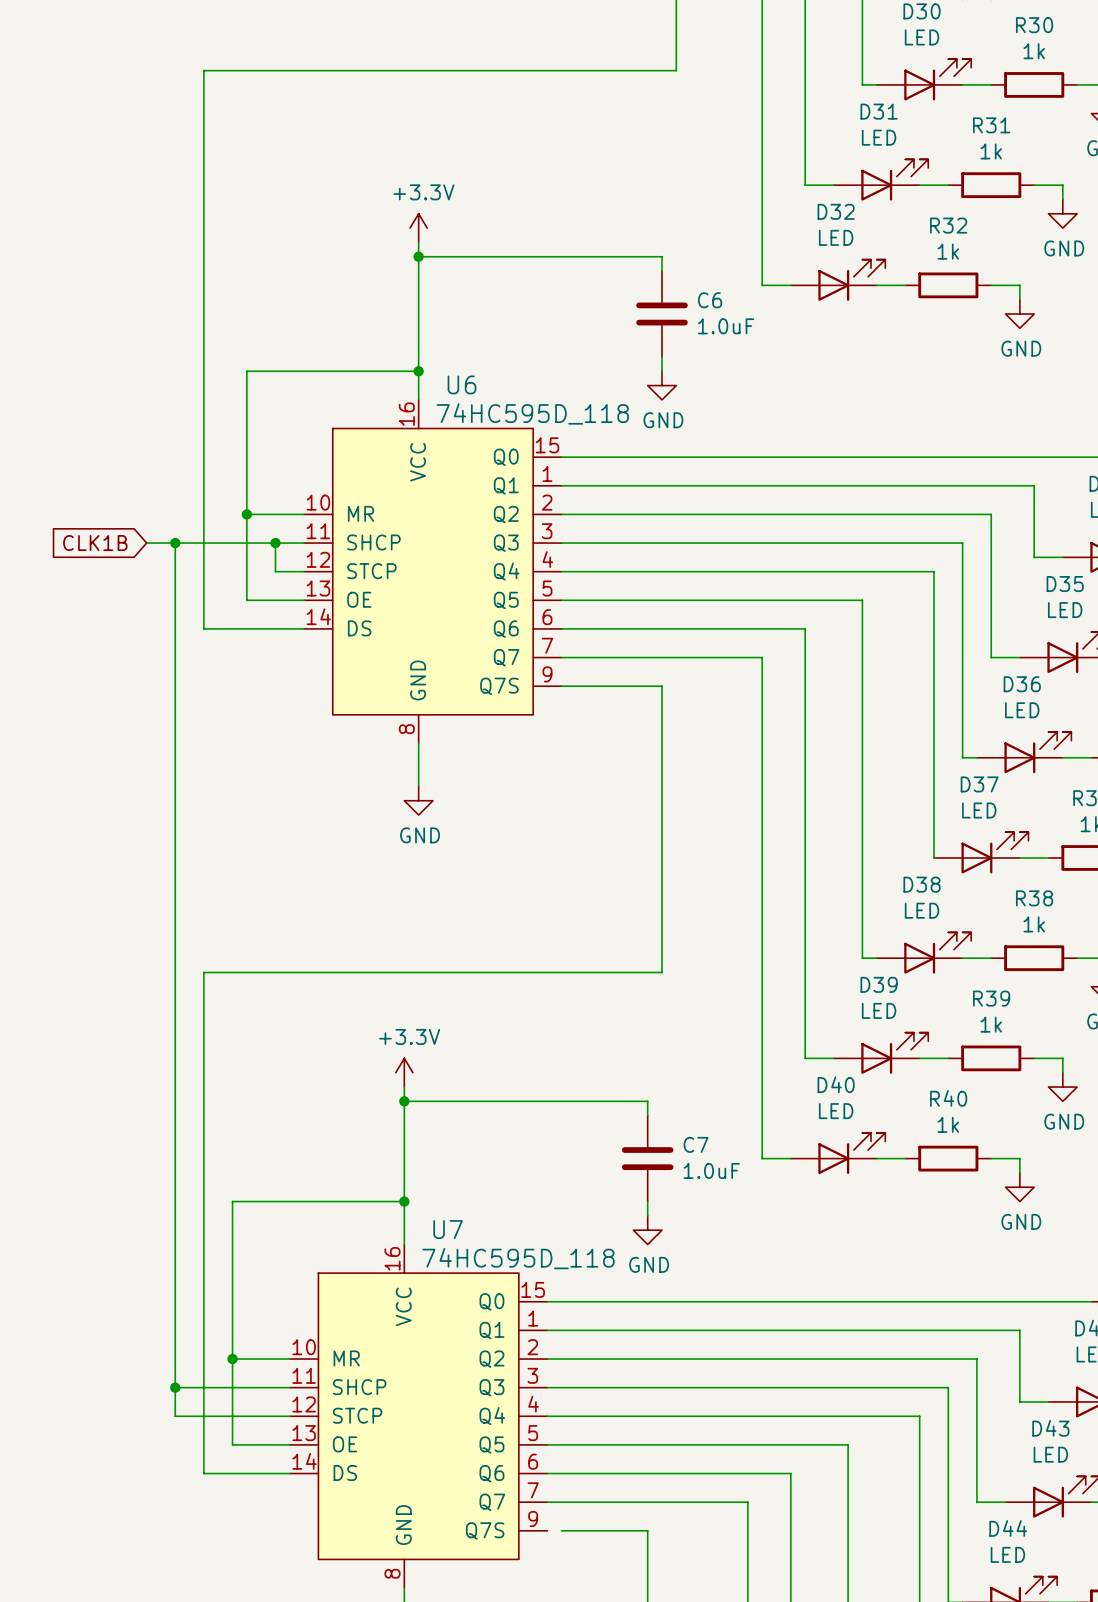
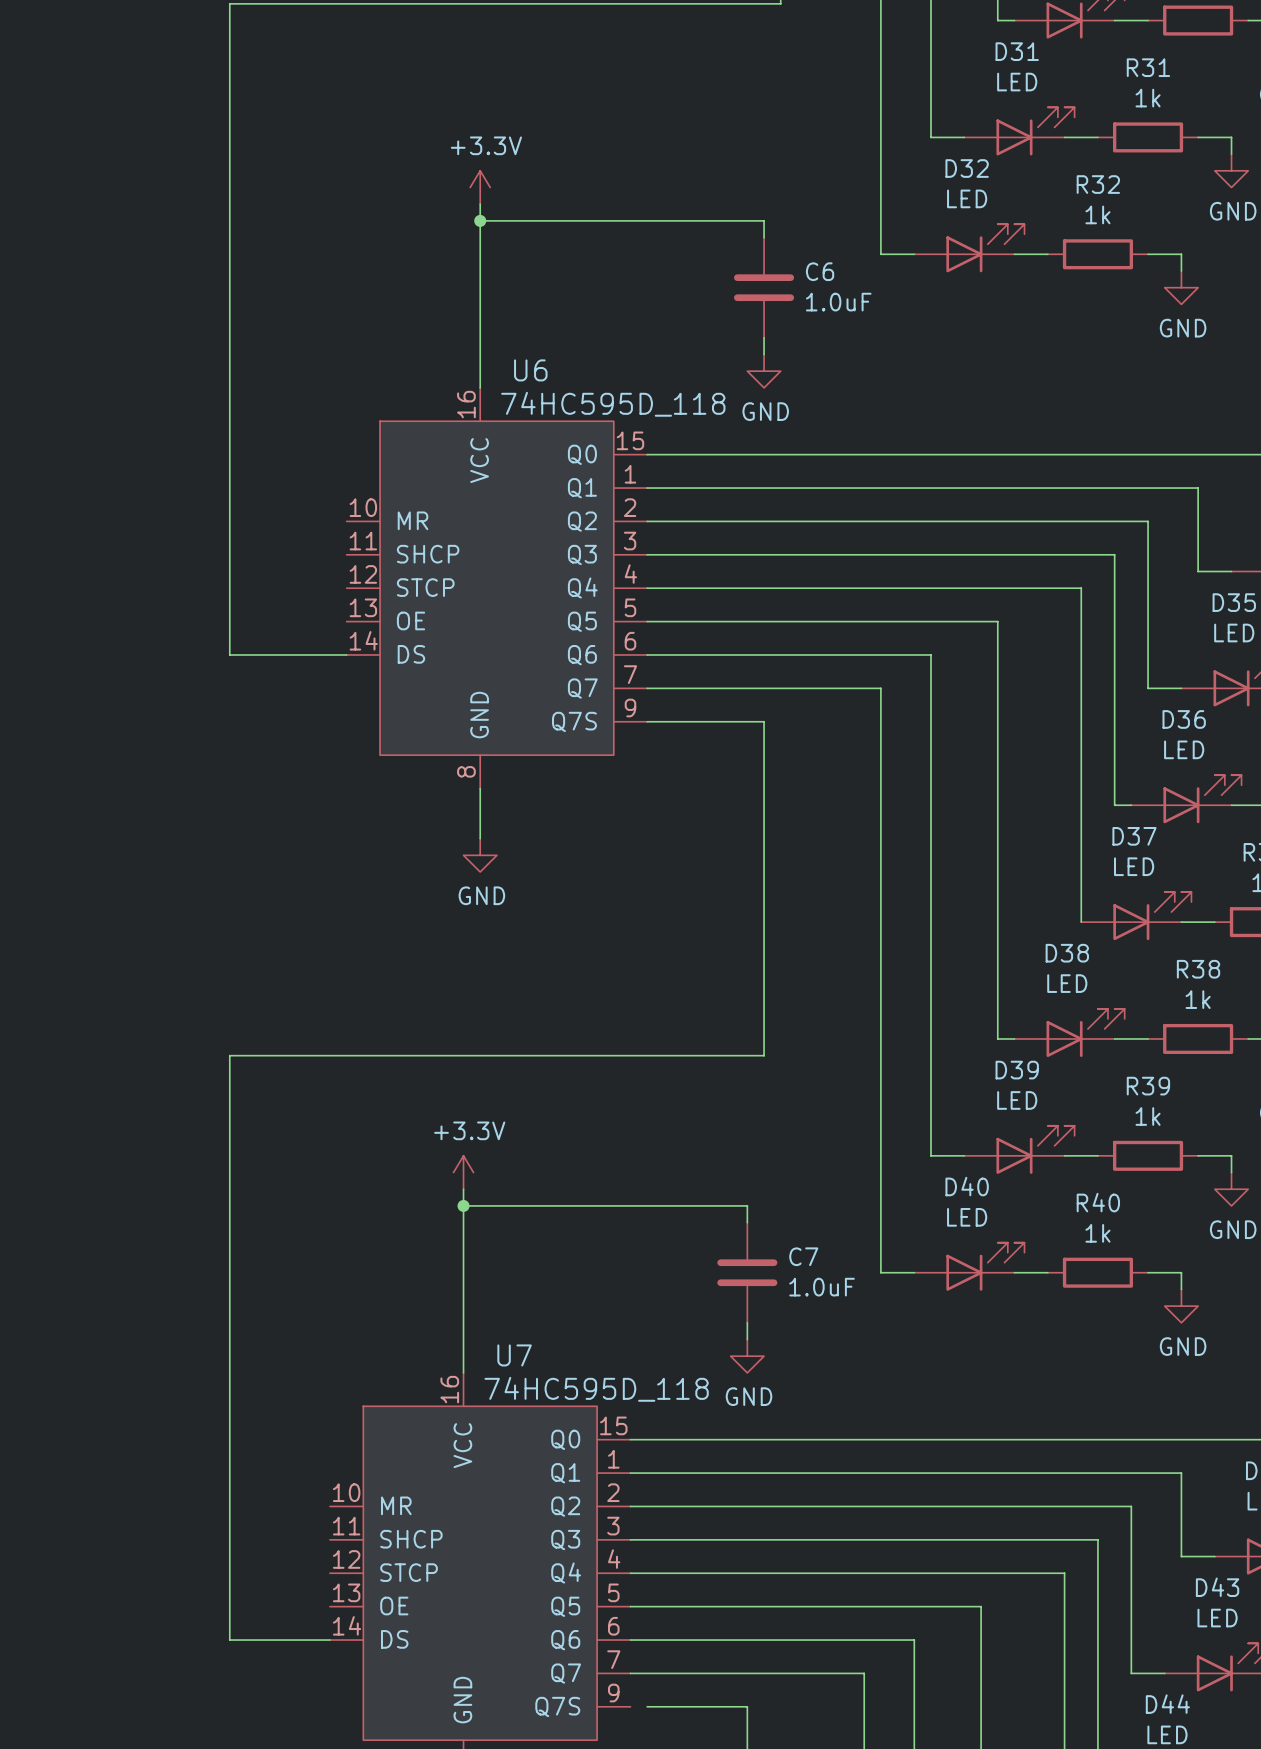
wire: (418, 371) (246, 371) (246, 600) (304, 600) -> none
junction: (418, 371) -> none
wire: (246, 514) (304, 514) -> none
junction: (246, 514) -> none
global label: CLK1B (95, 543) -> none
wire: (146, 543) (304, 543) -> none
wire: (175, 543) (175, 1416) (289, 1416) -> none
junction: (175, 543) -> none
wire: (275, 543) (275, 571) (304, 571) -> none
junction: (275, 543) -> none
wire: (404, 1201) (232, 1201) (232, 1444) (289, 1444) -> none
junction: (404, 1201) -> none
wire: (232, 1359) (289, 1359) -> none
junction: (232, 1359) -> none
wire: (175, 1387) (289, 1387) -> none
junction: (175, 1387) -> none

